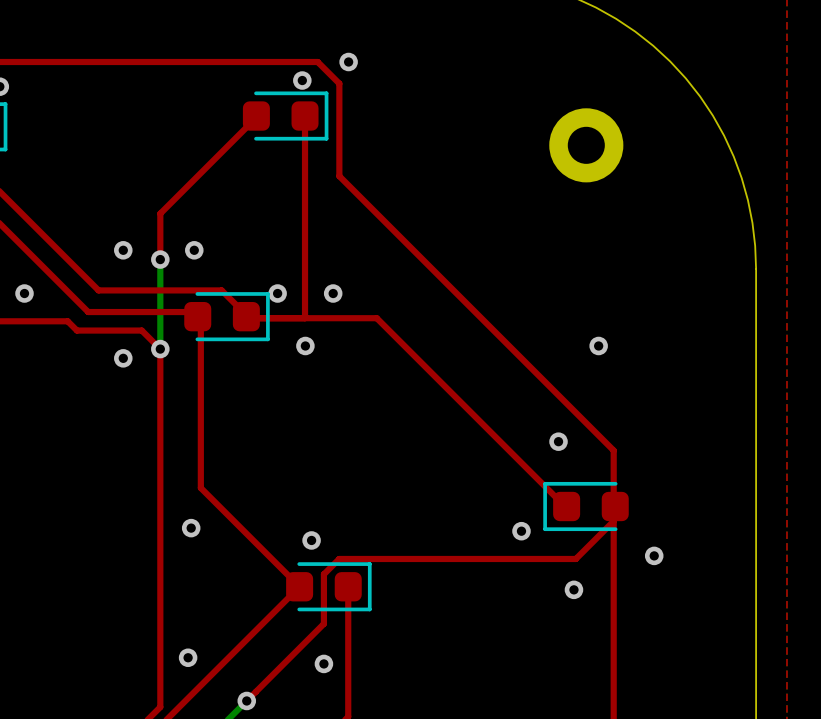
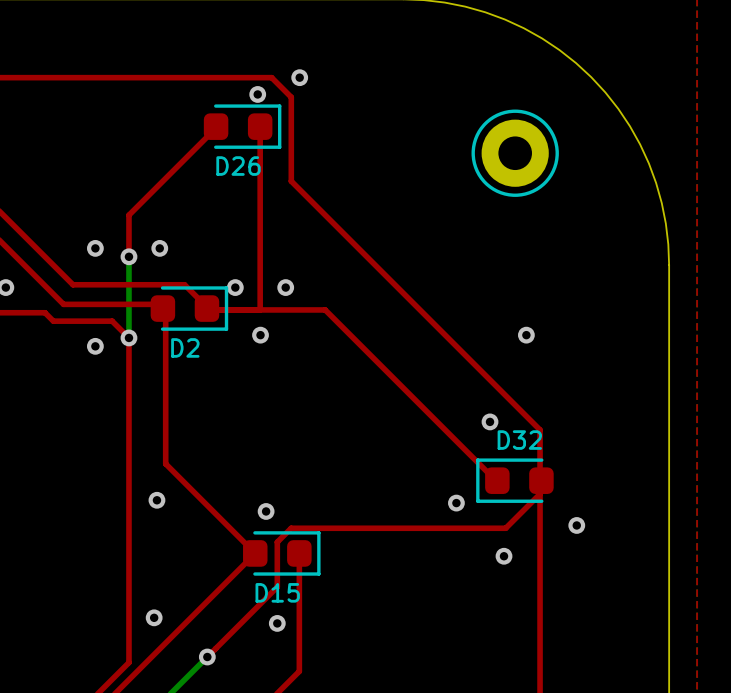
part footprint: [549, 108, 624, 183] -> [471, 109, 559, 197]
D26 name: none -> D26 (238, 166)
D2 name: none -> D2 (185, 347)
D32 name: none -> D32 (519, 440)
D15 name: none -> D15 (277, 592)

